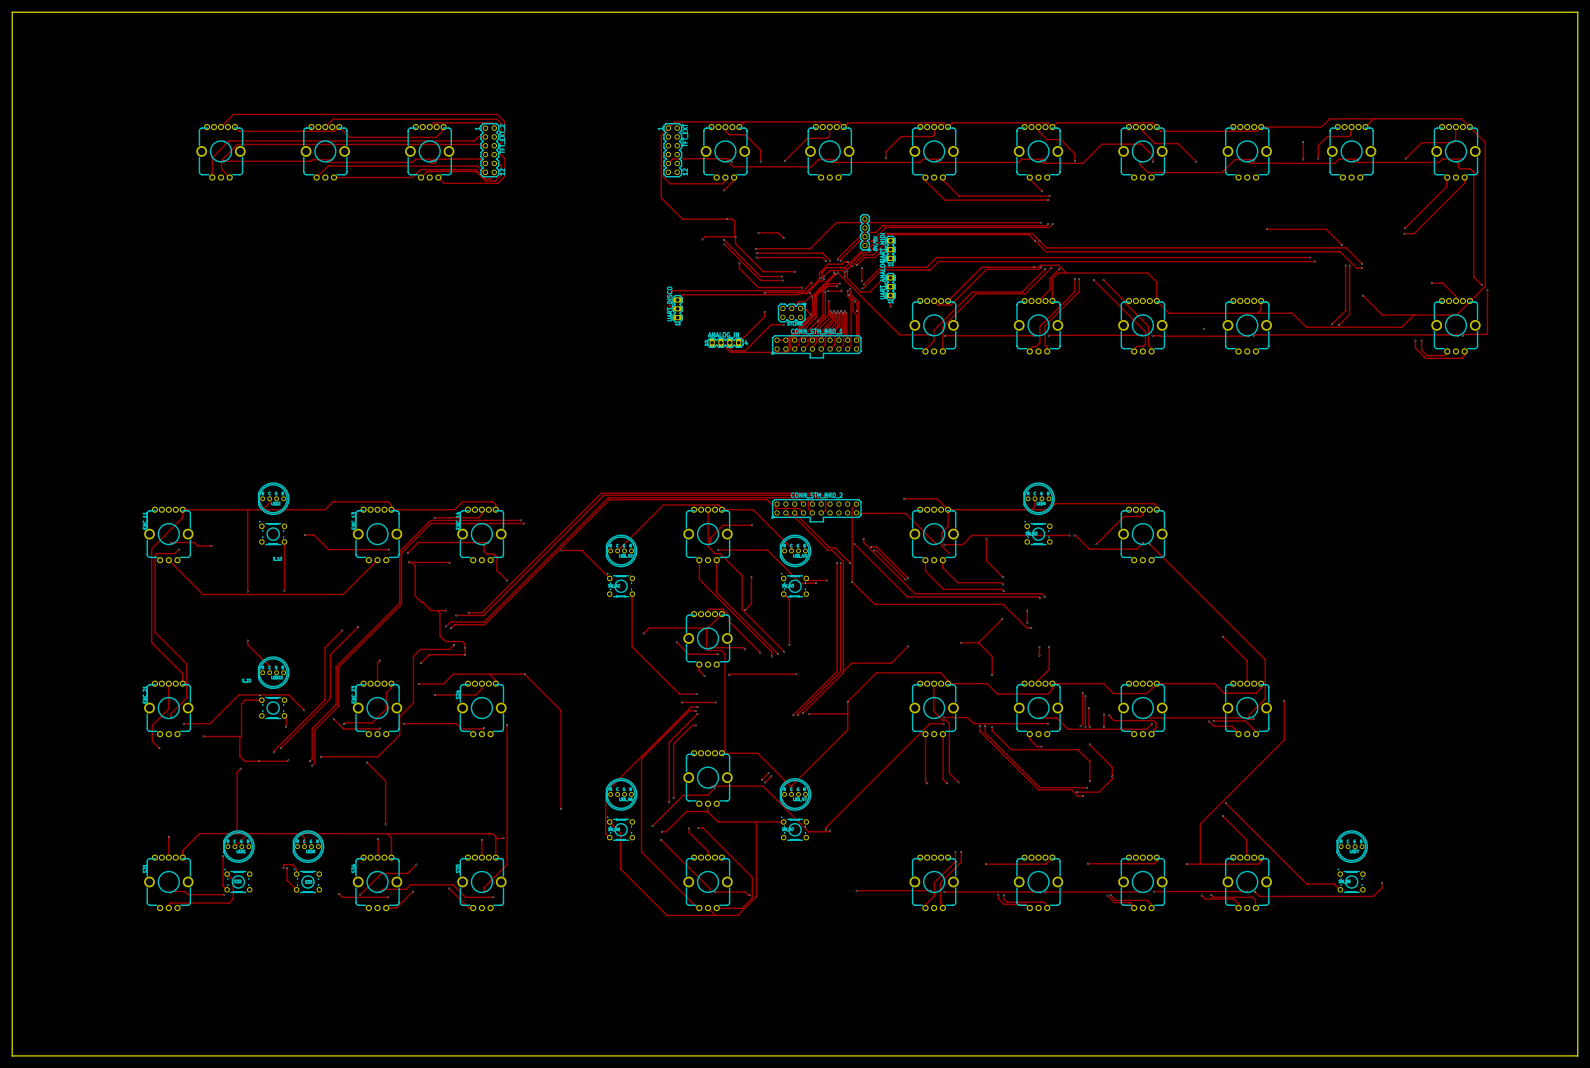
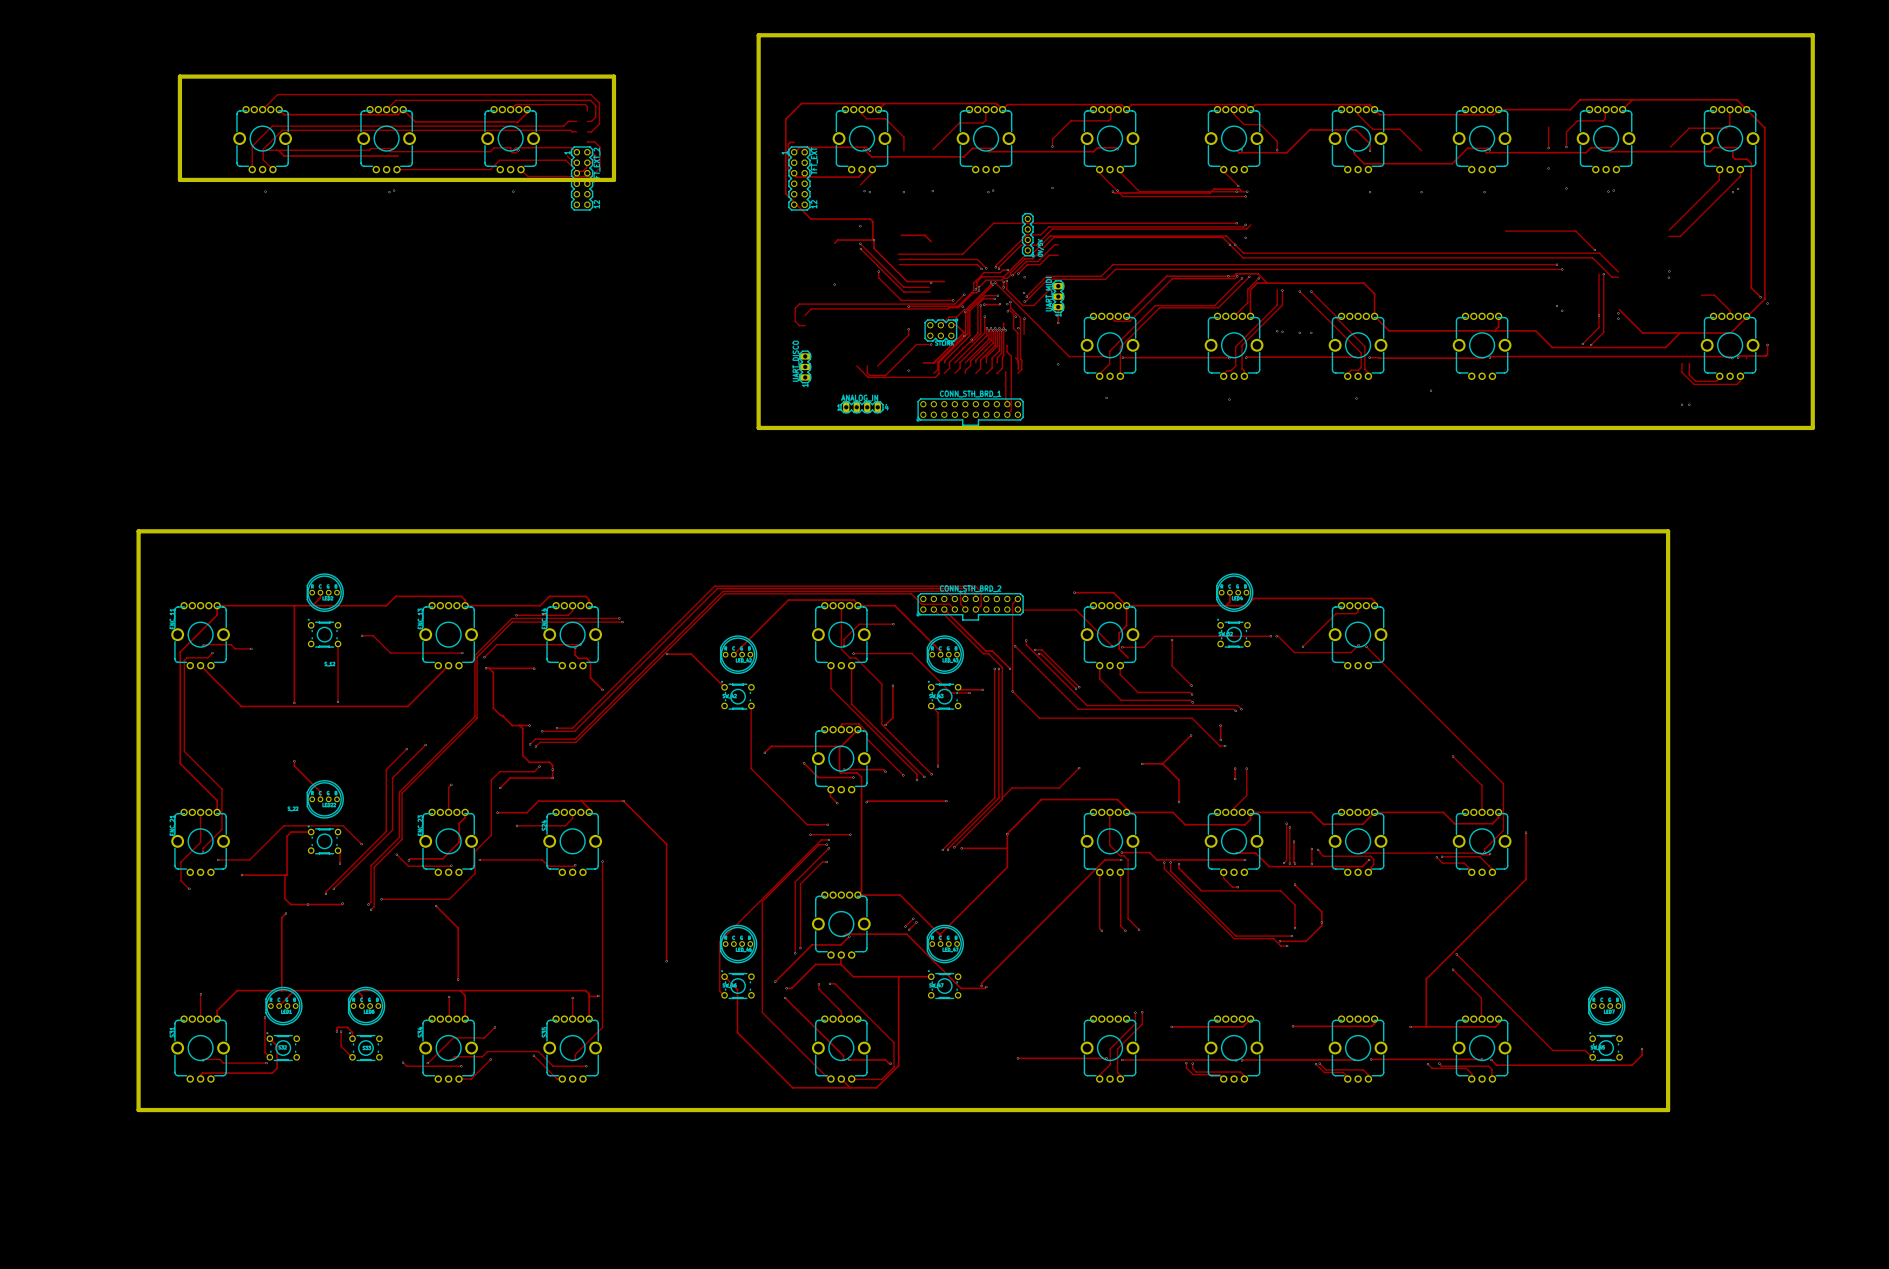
board edge: (12, 12) (1577, 12) (1577, 1055) (12, 1055) (12, 12) -> none
board edge: none -> (758, 35) (758, 427) (1812, 427) (1812, 35) (758, 35)
board edge: none -> (179, 76) (613, 76) (613, 179) (179, 179) (179, 76)
track: none -> (279, 109) (284, 114) (398, 114) (403, 109) (415, 121) (518, 121) (527, 112) (527, 109)
track: none -> (386, 109) (395, 100) (590, 100) (595, 105) (595, 117) (591, 121) (587, 121)
track: (1373, 118) (1365, 127) -> (1632, 99) (1622, 109)
track: (744, 121) (739, 127) -> (884, 103) (878, 109)
via: none -> (1052, 146)
via: none -> (1566, 147)
via: none -> (1548, 148)
via: none -> (1117, 149)
via: none -> (518, 150)
via: none -> (864, 149)
via: none -> (869, 150)
via: none -> (1242, 150)
via: none -> (1277, 150)
via: none -> (1370, 150)
via: none -> (1489, 150)
track: (220, 127) (233, 114) (497, 114) (504, 121) (504, 139) (497, 145) (494, 145) -> (262, 109) (277, 94) (591, 94) (599, 103) (599, 124) (591, 131) (587, 131)
track: (325, 127) (333, 119) (496, 119) (501, 123) (501, 131) -> (587, 152) (592, 152) (595, 156)
track: (429, 127) (433, 122) (492, 122) (494, 128) -> (510, 109) (515, 104) (585, 104) (587, 110)
track: (443, 127) (443, 129) (435, 137) (349, 137) (339, 127) (335, 131) -> none
track: (725, 127) (725, 130) (729, 134) (745, 134) (760, 150) (760, 161) -> (862, 109) (862, 114) (866, 118) (885, 118) (903, 137) (903, 150)
track: (829, 127) (829, 136) (827, 138) (807, 138) (784, 160) -> (986, 109) (985, 120) (983, 122) (959, 122) (932, 149)
track: (934, 127) (934, 134) (932, 136) (901, 136) (885, 151) (885, 158) -> (1110, 109) (1110, 118) (1108, 120) (1070, 120) (1052, 139) (1052, 146)
track: (1038, 127) (1038, 131) (1046, 139) (1060, 139) (1074, 153) (1074, 161) -> (1234, 109) (1234, 114) (1244, 124) (1260, 124) (1277, 141) (1277, 150)
via: none -> (1354, 151)
track: (1142, 127) (1142, 131) (1155, 143) (1178, 143) (1196, 161) -> (1358, 109) (1358, 114) (1372, 129) (1400, 129) (1421, 150)
track: (1351, 127) (1349, 136) (1327, 136) (1318, 145) (1318, 158) -> (1606, 109) (1605, 118) (1603, 120) (1577, 120) (1566, 131) (1566, 147)
track: (1455, 127) (1455, 140) (1453, 142) (1421, 142) (1405, 158) -> (1730, 109) (1729, 125) (1726, 128) (1689, 128) (1670, 147)
track: none -> (567, 156) (576, 163)
track: (661, 135) (674, 121) (838, 121) (843, 127) (847, 122) (943, 122) (948, 127) (952, 122) (1048, 122) (1052, 127) (1056, 122) (1152, 122) (1161, 131) (1256, 131) (1261, 127) (1321, 127) (1329, 118) (1461, 118) (1485, 142) -> (785, 160) (785, 119) (801, 103) (996, 103) (1002, 109) (1007, 104) (1121, 104) (1126, 109) (1131, 104) (1245, 104) (1250, 109) (1255, 104) (1369, 104) (1379, 114) (1493, 114) (1498, 109) (1570, 109) (1580, 99) (1736, 99) (1764, 127) (1764, 169)
track: (485, 136) (478, 136) (474, 140) (229, 140) (212, 157) (212, 177) -> (576, 121) (568, 121) (563, 126) (272, 126) (252, 146) (252, 169)
track: (1303, 141) (1303, 159) -> (1548, 127) (1548, 148)
track: (485, 145) (237, 144) (221, 160) (221, 169) (229, 177) -> (576, 131) (570, 130) (282, 130) (263, 149) (263, 159) (272, 169)
part position: (220, 152) -> (262, 139)
part position: (325, 152) -> (386, 139)
part position: (429, 152) -> (510, 139)
part position: (725, 152) -> (862, 139)
part position: (829, 152) -> (986, 139)
part position: (934, 152) -> (1110, 139)
part position: (1038, 152) -> (1234, 139)
part position: (1142, 152) -> (1358, 139)
part position: (1247, 152) -> (1482, 139)
part position: (1351, 152) -> (1606, 139)
part position: (1455, 152) -> (1730, 139)
track: (494, 154) (500, 154) (504, 158) (504, 176) (497, 183) (444, 183) (438, 177) -> (587, 142) (594, 141) (599, 147) (599, 168) (591, 176) (527, 176) (520, 169)
track: (668, 154) (663, 155) (663, 177) (670, 183) (722, 183) (725, 177) -> (794, 142) (788, 143) (788, 169) (796, 177) (858, 177) (862, 173) (862, 169)
via: none -> (1238, 185)
via: (1405, 158) -> none
via: (1303, 159) -> none
track: (1462, 159) (1442, 159) (1439, 162) (1353, 161) -> (1738, 147) (1713, 147) (1709, 151) (1608, 150)
track: (331, 160) (223, 161) -> (394, 149) (265, 150)
track: (835, 160) (818, 159) (811, 166) (733, 166) (727, 160) -> (993, 149) (972, 148) (963, 156) (871, 156) (864, 149)
track: (940, 160) (923, 159) (920, 162) (831, 161) -> (1117, 149) (1097, 147) (1093, 151) (988, 150)
track: (1358, 160) (1338, 159) (1334, 163) (1250, 163) (1249, 161) -> (1613, 149) (1590, 147) (1586, 152) (1486, 152) (1484, 150)
track: (431, 161) (433, 159) (481, 159) (485, 163) -> (513, 150) (515, 147) (571, 147) (576, 152)
track: (436, 161) (431, 163) (429, 159) (415, 159) (412, 162) (327, 161) -> (518, 150) (512, 152) (510, 147) (494, 147) (490, 151) (389, 150)
via: (436, 161) -> none
track: (731, 161) (729, 158) (681, 158) (672, 159) (668, 163) -> (869, 150) (866, 147) (809, 147) (799, 147) (794, 152)
track: (1040, 161) (1042, 163) (1082, 163) (1102, 144) (1141, 144) (1153, 155) (1153, 161) -> (1236, 150) (1239, 152) (1286, 152) (1309, 129) (1356, 129) (1370, 143) (1370, 150)
via: (1045, 161) -> none
via: none -> (1247, 191)
via: (1074, 161) -> none
track: (1253, 161) (1235, 159) (1222, 172) (1148, 172) (1139, 162) -> (1489, 150) (1487, 148) (1467, 148) (1452, 163) (1364, 163) (1354, 153) (1354, 151)
via: (1253, 161) -> none
track: (1458, 161) (1460, 168) (1470, 168) (1473, 172) -> (1732, 150) (1732, 157) (1734, 159) (1747, 159) (1751, 163) (1751, 204)
via: (1139, 162) -> none
track: (494, 163) (498, 163) (501, 166) (501, 174) (495, 181) (485, 181) (475, 171) (427, 171) (421, 177) -> none
track: (661, 163) (661, 197) (682, 219) (732, 219) (734, 221) (735, 236) -> (785, 193) (810, 219) (870, 219) (872, 221) (873, 240)
via: none -> (1245, 196)
track: (485, 172) (477, 166) (328, 166) (316, 177) -> none
track: (494, 172) (490, 178) (485, 178) (476, 169) (420, 169) (412, 177) (334, 177) -> (587, 163) (583, 171) (576, 171) (565, 160) (499, 160) (490, 169) (396, 169)
track: (734, 177) (734, 180) (724, 190) -> (872, 169) (872, 172) (860, 184)
track: (925, 177) (925, 180) (944, 200) (1048, 200) -> (1099, 169) (1099, 173) (1122, 196) (1245, 196)
track: (942, 177) (942, 179) (959, 196) (1049, 196) -> (1120, 169) (1120, 172) (1139, 191) (1247, 191)
track: (1029, 177) (1042, 191) -> (1223, 169) (1238, 185)
track: (1447, 177) (1446, 186) (1404, 228) -> (1719, 169) (1719, 180) (1669, 230)
track: (1464, 177) (1464, 183) (1414, 233) (1404, 233) -> (1740, 169) (1740, 176) (1680, 236) (1668, 236)
via: none -> (1236, 223)
via: none -> (1245, 224)
via: (1042, 191) -> none
via: (1049, 196) -> none
via: none -> (873, 240)
via: none -> (860, 243)
via: none -> (1229, 244)
via: none -> (1235, 244)
via: none -> (860, 248)
via: none -> (1594, 250)
via: (727, 219) -> none
track: (1040, 222) (836, 222) (810, 248) (755, 248) -> (1236, 223) (993, 223) (962, 254) (898, 254)
via: (1040, 222) -> none
via: none -> (1557, 264)
track: (1048, 223) (1046, 225) (882, 225) (876, 232) (864, 232) (838, 259) -> (1245, 224) (1243, 226) (1048, 226) (1040, 234) (1026, 234) (995, 267)
via: (1048, 223) -> none
track: (1052, 223) (1049, 227) (885, 227) (872, 241) (859, 241) (840, 261) -> (1250, 224) (1246, 229) (1052, 229) (1036, 245) (1020, 245) (998, 268)
via: (1052, 223) -> none
via: none -> (995, 267)
via: none -> (986, 268)
via: none -> (981, 268)
via: none -> (998, 268)
via: none -> (1562, 269)
via: none -> (1007, 269)
via: none -> (878, 271)
track: (1267, 229) (1326, 229) (1342, 245) -> (1505, 231) (1575, 231) (1594, 250)
via: (1267, 229) -> none
via: none -> (1018, 273)
track: none -> (1599, 274) (1599, 315)
track: none -> (1603, 274) (1603, 315)
via: none -> (1012, 275)
track: (758, 232) (778, 232) (783, 238) -> (901, 235) (924, 235) (931, 241)
via: (758, 232) -> none
part position: (865, 232) -> (1028, 235)
via: none -> (1228, 276)
via: none -> (1237, 276)
via: none -> (1249, 276)
via: none -> (1024, 277)
via: none -> (1242, 278)
via: none -> (1258, 278)
track: (735, 236) (705, 236) (702, 239) -> (873, 240) (837, 240) (834, 243)
track: (735, 236) (735, 243) (763, 271) (794, 271) -> (873, 240) (873, 248) (907, 281) (944, 281)
via: (735, 236) -> none
via: none -> (1006, 280)
via: none -> (991, 282)
via: none -> (995, 282)
track: none -> (1003, 281) (1003, 287)
via: none -> (1003, 281)
track: (724, 239) (760, 276) (781, 276) -> (860, 243) (903, 287) (929, 287)
via: (724, 239) -> none
via: none -> (993, 284)
track: (890, 240) (887, 240) (873, 254) (863, 254) (852, 266) -> (1058, 244) (1054, 244) (1037, 261) (1026, 261) (1012, 275)
via: (1035, 240) -> none
via: (1039, 240) -> none
via: none -> (978, 287)
via: none -> (1003, 287)
track: (1473, 242) (1473, 277) (1481, 284) -> (1751, 287) (1760, 297)
via: none -> (975, 289)
track: (724, 244) (760, 280) (782, 280) -> (860, 248) (903, 292) (930, 292)
via: (724, 244) -> none
via: none -> (978, 290)
via: none -> (1282, 290)
via: none -> (1299, 291)
via: none -> (1311, 291)
via position: (1342, 245) -> (1603, 274)
via: none -> (1024, 292)
via: none -> (964, 294)
via: (755, 248) -> none
via: none -> (997, 295)
via: none -> (1026, 296)
track: (890, 249) (883, 249) (875, 257) (864, 257) (857, 265) -> (1058, 255) (1049, 255) (1039, 264) (1027, 264) (1018, 273)
via: none -> (1760, 297)
via: none -> (994, 298)
track: (1485, 251) (1485, 286) (1456, 314) (1382, 314) (1362, 295) -> (1764, 298) (1730, 332) (1642, 332) (1619, 309)
via: none -> (953, 300)
track: (756, 253) (822, 253) (830, 260) -> (899, 259) (977, 259) (986, 268)
via: (756, 253) -> none
via: none -> (1024, 301)
via: none -> (1010, 301)
via: none -> (999, 304)
via: none -> (1007, 304)
via: none -> (1767, 303)
via: none -> (984, 304)
track: (756, 257) (822, 257) (826, 261) -> (899, 264) (977, 264) (981, 268)
via: (756, 257) -> none
via: none -> (980, 305)
track: (1310, 257) (936, 257) (926, 267) (880, 267) (864, 284) -> (1557, 264) (1112, 264) (1101, 276) (1046, 276) (1026, 296)
via: none -> (908, 306)
via: none -> (962, 306)
via: (838, 259) -> none
via: (830, 260) -> none
via: (826, 261) -> none
via: (840, 261) -> none
track: (848, 261) (841, 264) (828, 264) (819, 273) (819, 279) (806, 292) (764, 292) -> (1007, 269) (1003, 269) (1000, 272) (984, 272) (973, 283) (973, 290) (957, 306) (908, 306)
track: (1314, 261) (938, 261) (930, 269) (881, 269) (862, 288) -> (1562, 269) (1115, 269) (1105, 279) (1047, 279) (1024, 301)
via: none -> (965, 311)
track: (739, 263) (739, 268) (758, 287) (802, 287) -> (878, 271) (878, 277) (901, 300) (953, 300)
via: (739, 263) -> none
track: (1361, 263) (1346, 247) (1046, 247) (1032, 233) (883, 233) (867, 250) (862, 250) (844, 267) (826, 267) (822, 272) (821, 278) -> (1618, 272) (1599, 253) (1243, 253) (1226, 236) (1050, 236) (1030, 255) (1024, 255) (1003, 276) (982, 276) (976, 282) (975, 289)
via: (857, 265) -> none
via: (1349, 265) -> none
via: none -> (984, 316)
via: (852, 266) -> none
via: none -> (1015, 316)
via: (1033, 267) -> none
track: (1041, 267) (1039, 269) (986, 269) (950, 305) (938, 305) (934, 301) -> (1237, 276) (1234, 278) (1172, 278) (1129, 321) (1114, 321) (1110, 316)
via: (1041, 267) -> none
track: (1051, 267) (1025, 293) (975, 293) (942, 326) (942, 351) -> (1249, 276) (1218, 307) (1159, 307) (1120, 347) (1120, 376)
via: (1051, 267) -> none
track: (1361, 268) (1356, 268) (1340, 251) (1046, 251) (1028, 234) (886, 234) (868, 252) (862, 252) (847, 269) (829, 270) (823, 276) -> (1618, 277) (1612, 277) (1592, 257) (1243, 257) (1222, 237) (1053, 237) (1032, 258) (1024, 258) (1007, 278) (986, 280) (978, 287)
track: (1045, 269) (1022, 292) (972, 292) (933, 330) (933, 341) (925, 351) -> (1242, 278) (1214, 305) (1155, 305) (1109, 351) (1109, 363) (1099, 376)
via: (1045, 269) -> none
track: (1059, 269) (1050, 278) (1050, 289) (1038, 301) -> (1258, 278) (1247, 289) (1247, 302) (1234, 316)
via: (1059, 269) -> none
via: (794, 271) -> none
via: (844, 271) -> none
track: (847, 271) (847, 278) (860, 291) (869, 291) (883, 277) (890, 277) -> (1006, 280) (1006, 289) (1022, 305) (1033, 305) (1050, 288) (1058, 288)
via: (847, 271) -> none
via: none -> (1058, 322)
track: (834, 272) (812, 295) (805, 301) (798, 301) (791, 308) -> (991, 282) (966, 309) (956, 317) (948, 317) (940, 325)
via: (834, 272) -> none
track: (837, 272) (899, 334) (931, 334) -> (995, 282) (1069, 356) (1106, 356)
via: (837, 272) -> none
track: (1066, 273) (1058, 265) (1040, 265) (1038, 267) (981, 267) (948, 301) -> (1267, 283) (1257, 273) (1236, 273) (1233, 276) (1166, 276) (1126, 316)
track: (835, 274) (814, 295) (814, 315) (790, 339) (790, 349) (787, 352) (730, 352) (721, 342) -> (993, 284) (967, 309) (967, 333) (938, 362) (938, 373) (935, 377) (868, 377) (856, 365)
via: (835, 274) -> none
track: (1345, 275) (1345, 310) (1331, 324) -> (1599, 327) (1582, 343)
via: (781, 276) -> none
via: (823, 276) -> none
via: none -> (986, 328)
via: none -> (991, 328)
via: none -> (995, 328)
via: none -> (999, 328)
track: none -> (1003, 328) (1002, 368) (996, 373)
via: none -> (1018, 328)
via: none -> (908, 329)
via: (821, 278) -> none
via: none -> (988, 330)
via: none -> (993, 330)
via: none -> (997, 330)
via: none -> (1001, 330)
via: none -> (1005, 330)
track: (1074, 278) (1074, 291) (1039, 326) (1039, 342) (1035, 346) (1032, 346) (1029, 351) -> (1277, 289) (1277, 305) (1235, 346) (1235, 366) (1230, 370) (1227, 370) (1223, 376)
track: (823, 279) (806, 293) (682, 294) (677, 299) -> (978, 290) (973, 292) (958, 307) (811, 308) (805, 315)
via: (823, 279) -> none
track: (1079, 279) (1079, 291) (1045, 325) (1047, 351) -> (1282, 290) (1282, 305) (1242, 345) (1242, 368) (1244, 371) (1244, 376)
track: (1349, 279) (1349, 314) (1339, 325) -> (1603, 332) (1591, 345)
via: (782, 280) -> none
track: (1093, 280) (1145, 331) (1145, 344) (1143, 346) (1137, 346) (1134, 351) -> (1299, 291) (1361, 352) (1361, 367) (1358, 370) (1351, 370) (1347, 376)
track: (1103, 280) (1148, 326) (1148, 345) (1151, 351) -> (1311, 291) (1364, 346) (1364, 369) (1368, 372) (1368, 376)
via: (861, 281) -> none
track: (811, 282) (803, 290) (672, 290) (669, 294) (669, 305) (672, 308) (677, 308) -> (964, 294) (954, 304) (799, 304) (795, 308) (795, 321) (799, 325) (805, 325)
track: (839, 283) (828, 283) (816, 296) (816, 317) (794, 340) -> (997, 295) (984, 295) (969, 310) (969, 335) (944, 362)
via: (839, 283) -> none
track: (1431, 283) (1442, 283) (1456, 296) (1455, 301) -> (1701, 295) (1714, 295) (1730, 310) (1730, 316)
via: (1431, 283) -> none
via: (864, 284) -> none
via: (1481, 284) -> none
via: none -> (971, 339)
track: (837, 286) (827, 286) (822, 291) (822, 315) (817, 320) -> (994, 298) (983, 298) (977, 304) (977, 333) (971, 339)
via: (837, 286) -> none
part: (890, 286) -> none
via: (802, 287) -> none
track: (850, 288) (850, 293) (858, 302) (859, 345) (856, 349) -> (1010, 301) (1010, 307) (1020, 317) (1021, 369) (1017, 373)
via: (850, 288) -> none
via: (862, 288) -> none
via: none -> (931, 344)
via: none -> (1582, 343)
track: (841, 290) (828, 291) -> (999, 304) (984, 304)
via: (841, 290) -> none
via: (847, 290) -> none
via: none -> (1591, 345)
track: (825, 291) (825, 315) (799, 339) (799, 344) (794, 349) -> (980, 305) (980, 333) (949, 362) (949, 368) (944, 373)
via: (825, 291) -> none
via: (828, 291) -> none
via: (764, 292) -> none
via: (810, 292) -> none
track: (849, 295) (853, 299) (853, 311) (856, 314) (856, 340) -> (1008, 309) (1013, 314) (1013, 328) (1017, 332) (1017, 362)
via: (849, 295) -> none
track: (890, 295) (890, 306) -> (1058, 309) (1058, 322)
via: (1362, 295) -> none
track: (812, 297) (812, 315) (789, 339) (789, 345) (785, 349) -> (965, 311) (965, 334) (937, 361) (937, 369) (933, 373)
via: (812, 297) -> none
track: (1487, 298) (1487, 333) (1462, 335) -> (1767, 354) (1738, 357)
via: none -> (1122, 357)
via: none -> (1246, 357)
via: none -> (1369, 357)
via: none -> (1489, 357)
via: none -> (1738, 357)
track: (828, 301) (828, 314) (803, 340) -> (984, 316) (984, 332) (954, 362)
via: (828, 301) -> none
via: (854, 301) -> none
via: none -> (1229, 358)
track: (1052, 301) (1052, 278) (1058, 273) (1147, 273) (1156, 282) (1156, 301) (1169, 313) (1292, 313) (1306, 327) (1401, 327) (1413, 314) -> (1250, 316) (1250, 289) (1257, 283) (1363, 283) (1374, 293) (1374, 316) (1389, 330) (1535, 330) (1552, 347) (1665, 347) (1680, 332)
track: (1261, 301) (1261, 309) (1257, 313) -> (1498, 316) (1498, 326) (1494, 330)
via: none -> (1732, 358)
track: (800, 308) (804, 308) (811, 314) (785, 340) (777, 340) -> (951, 325) (956, 325) (963, 332) (933, 362) (923, 362)
track: (764, 311) (764, 316) (738, 342) -> (908, 329) (908, 335) (877, 365)
track: (830, 311) (830, 317) (807, 339) (807, 344) (803, 349) -> (986, 328) (986, 335) (960, 362) (960, 368) (954, 373)
via: (830, 311) -> none
track: (834, 311) (834, 321) (816, 338) (812, 349) -> (991, 328) (991, 340) (970, 360) (970, 365) (965, 373)
via: (834, 311) -> none
track: (837, 311) (837, 325) (825, 337) (825, 345) (821, 349) -> (995, 328) (995, 345) (980, 360) (980, 368) (975, 373)
via: (837, 311) -> none
track: (841, 311) (841, 330) (834, 336) (834, 344) (830, 349) -> (999, 328) (999, 350) (992, 358) (992, 368) (986, 373)
via: (841, 311) -> none
track: (844, 311) (843, 344) (838, 349) -> none
via: (844, 311) -> none
via: (857, 311) -> none
part position: (792, 312) -> (941, 330)
track: (832, 312) (832, 320) (812, 340) -> (988, 330) (988, 339) (965, 362)
via: (832, 312) -> none
track: (835, 312) (835, 323) (821, 340) -> (993, 330) (993, 343) (975, 360) (975, 362)
via: (835, 312) -> none
track: (839, 312) (839, 326) (830, 335) (830, 340) -> (997, 330) (997, 346) (986, 357) (986, 362)
via: (839, 312) -> none
track: (842, 312) (842, 332) (839, 335) (838, 340) -> (1001, 330) (1001, 353) (997, 357) (996, 362)
via: (842, 312) -> none
via: (846, 312) -> none
via: (811, 314) -> none
via: (817, 320) -> none
track: (783, 324) (771, 324) (745, 350) (731, 350) (729, 348) (729, 342) -> (931, 344) (916, 344) (885, 375) (869, 375) (867, 372) (867, 365)
via: (783, 324) -> none
via: (1331, 324) -> none
via: (1339, 325) -> none
part position: (934, 326) -> (1110, 346)
part position: (1038, 326) -> (1234, 346)
part position: (1142, 326) -> (1358, 346)
part position: (1247, 326) -> (1482, 346)
part position: (1455, 326) -> (1730, 346)
track: (944, 335) (1034, 336) -> (1122, 357) (1229, 358)
via: (944, 335) -> none
via: (1048, 335) -> none
track: (1141, 335) (1048, 335) -> (1356, 357) (1246, 357)
track: (1152, 335) (1248, 336) -> (1369, 357) (1484, 358)
via: (1152, 335) -> none
track: (1253, 335) (1457, 336) -> (1489, 357) (1730, 356) (1732, 358)
via: (1253, 335) -> none
via: (1462, 335) -> none
via: (1248, 336) -> none
via: (1457, 336) -> none
track: (1415, 340) (1415, 348) (1425, 358) (1461, 358) (1464, 355) (1464, 351) -> (1681, 363) (1681, 372) (1694, 384) (1737, 384) (1740, 381) (1740, 376)
track: (1421, 340) (1421, 350) (1426, 355) (1444, 355) (1447, 351) -> (1689, 363) (1689, 374) (1695, 381) (1716, 381) (1719, 376)
board edge: none -> (138, 531) (1668, 531) (1668, 1110) (138, 1110) (138, 531)

